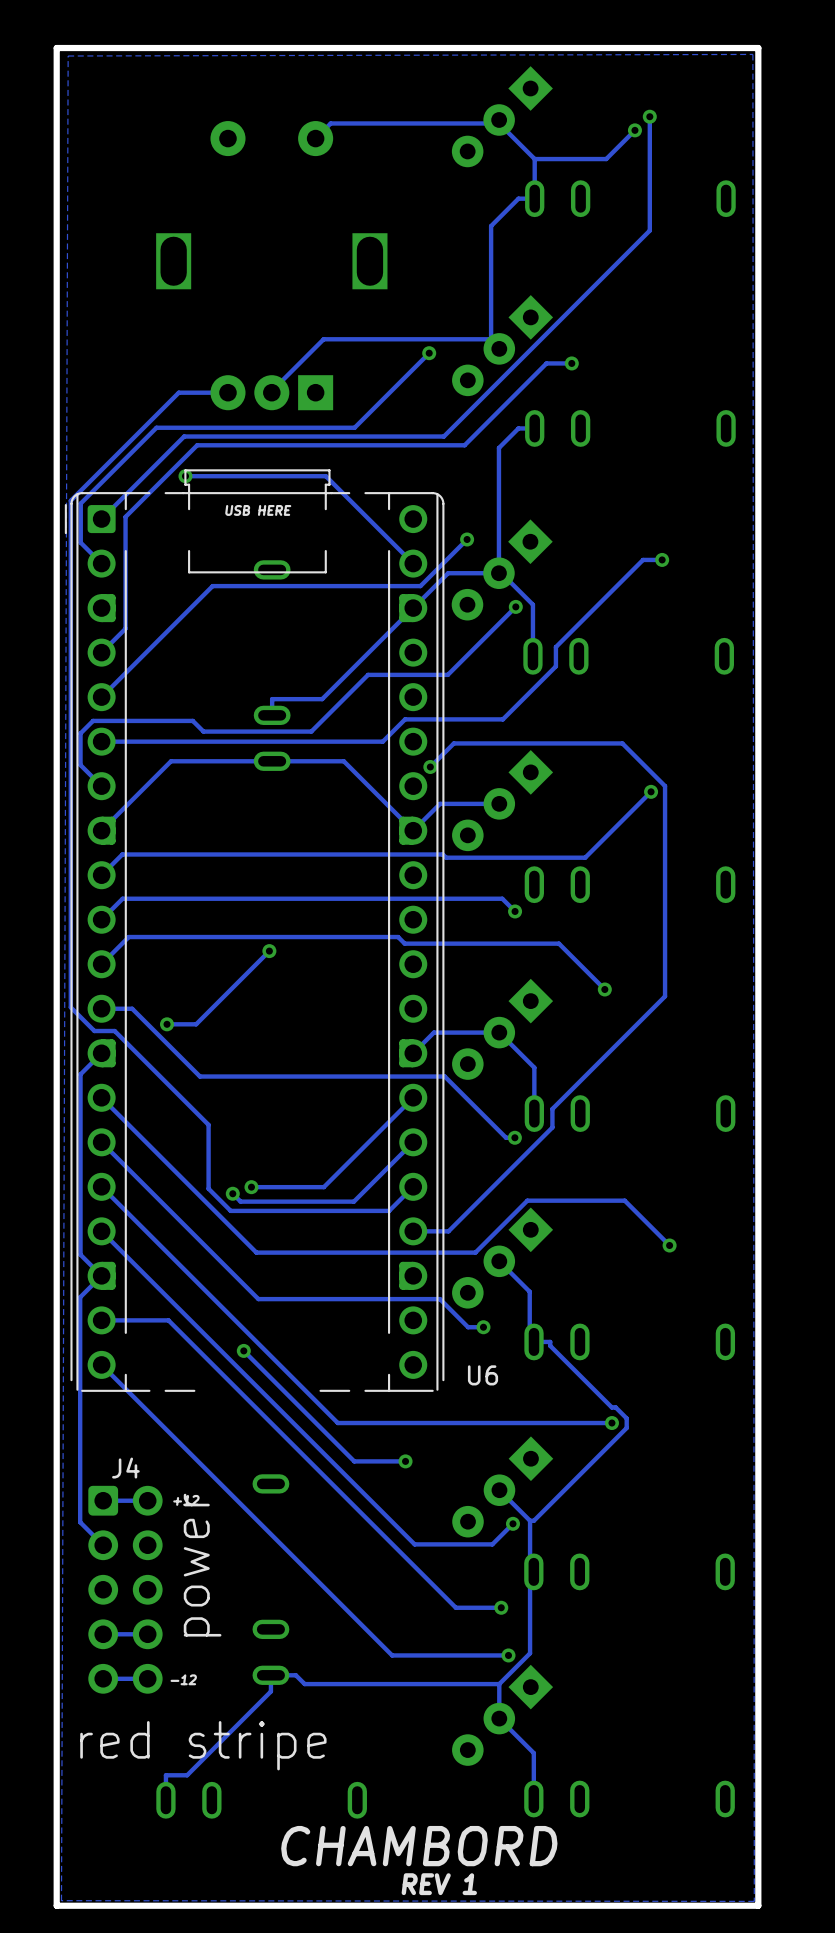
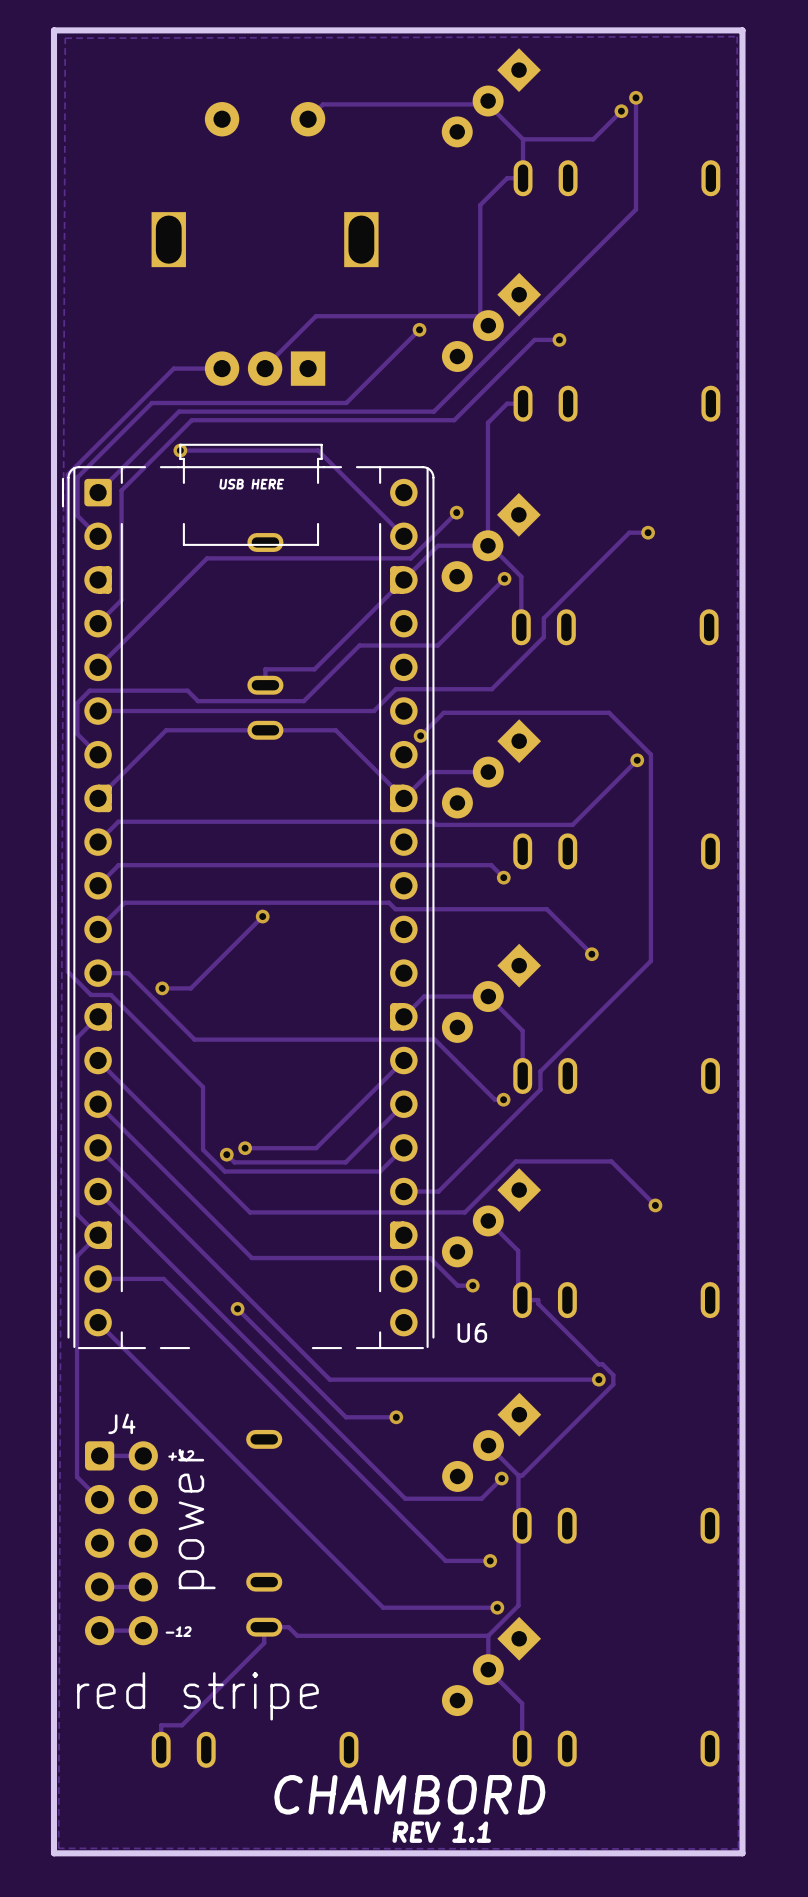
text: REV 1 (439, 1884) -> REV 1.1 (441, 1832)

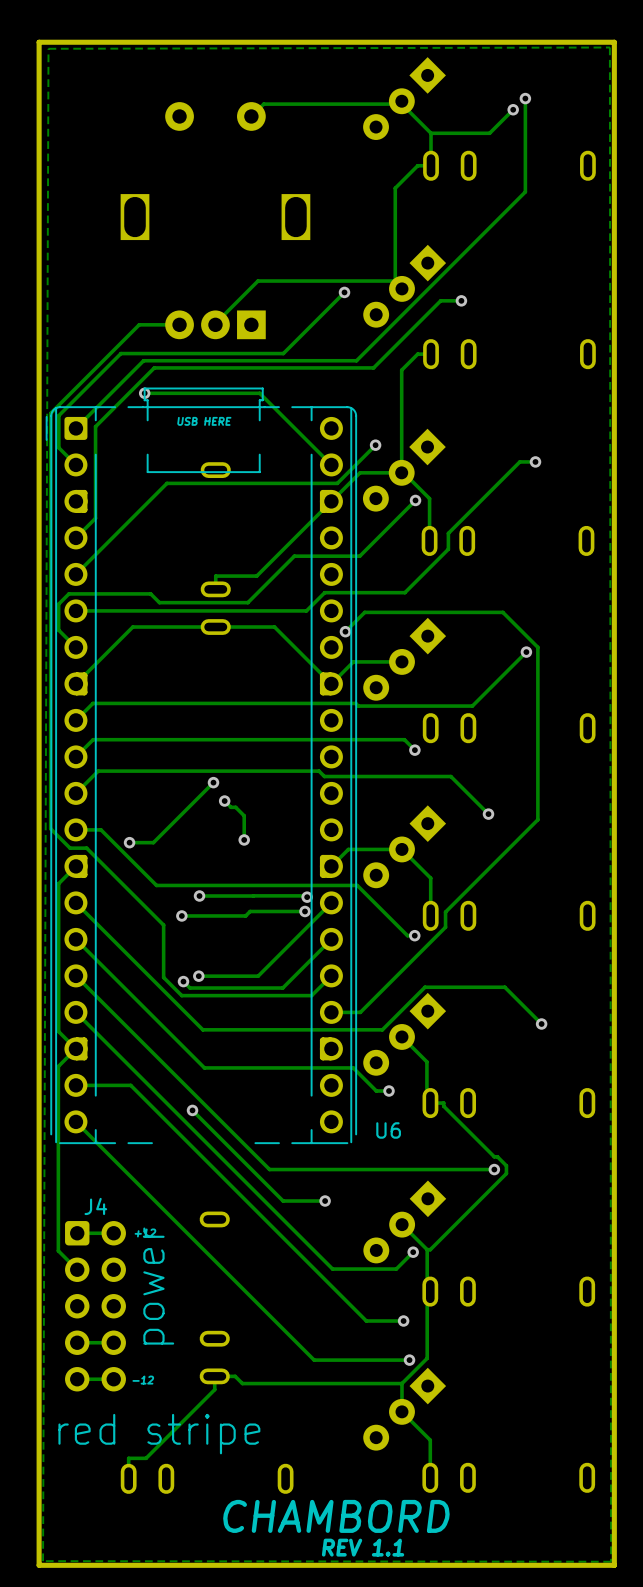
track: none -> (224, 801) (230, 807) (235, 807) (244, 815) (244, 839)
via: none -> (224, 801)
via: none -> (244, 839)
via: none -> (199, 896)
track: none -> (253, 895) (307, 897)
track: none -> (253, 896) (199, 896)
via: none -> (307, 897)
track: none -> (304, 911) (250, 911) (245, 915) (181, 915)
via: none -> (304, 911)
via: none -> (181, 915)

